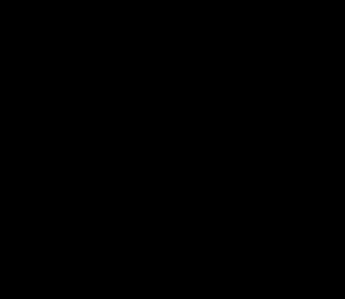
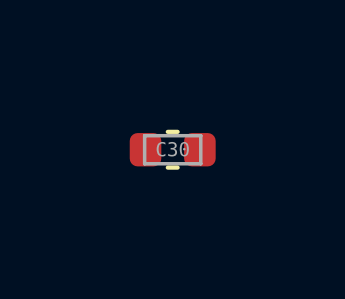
C30: none -> (172, 149)

